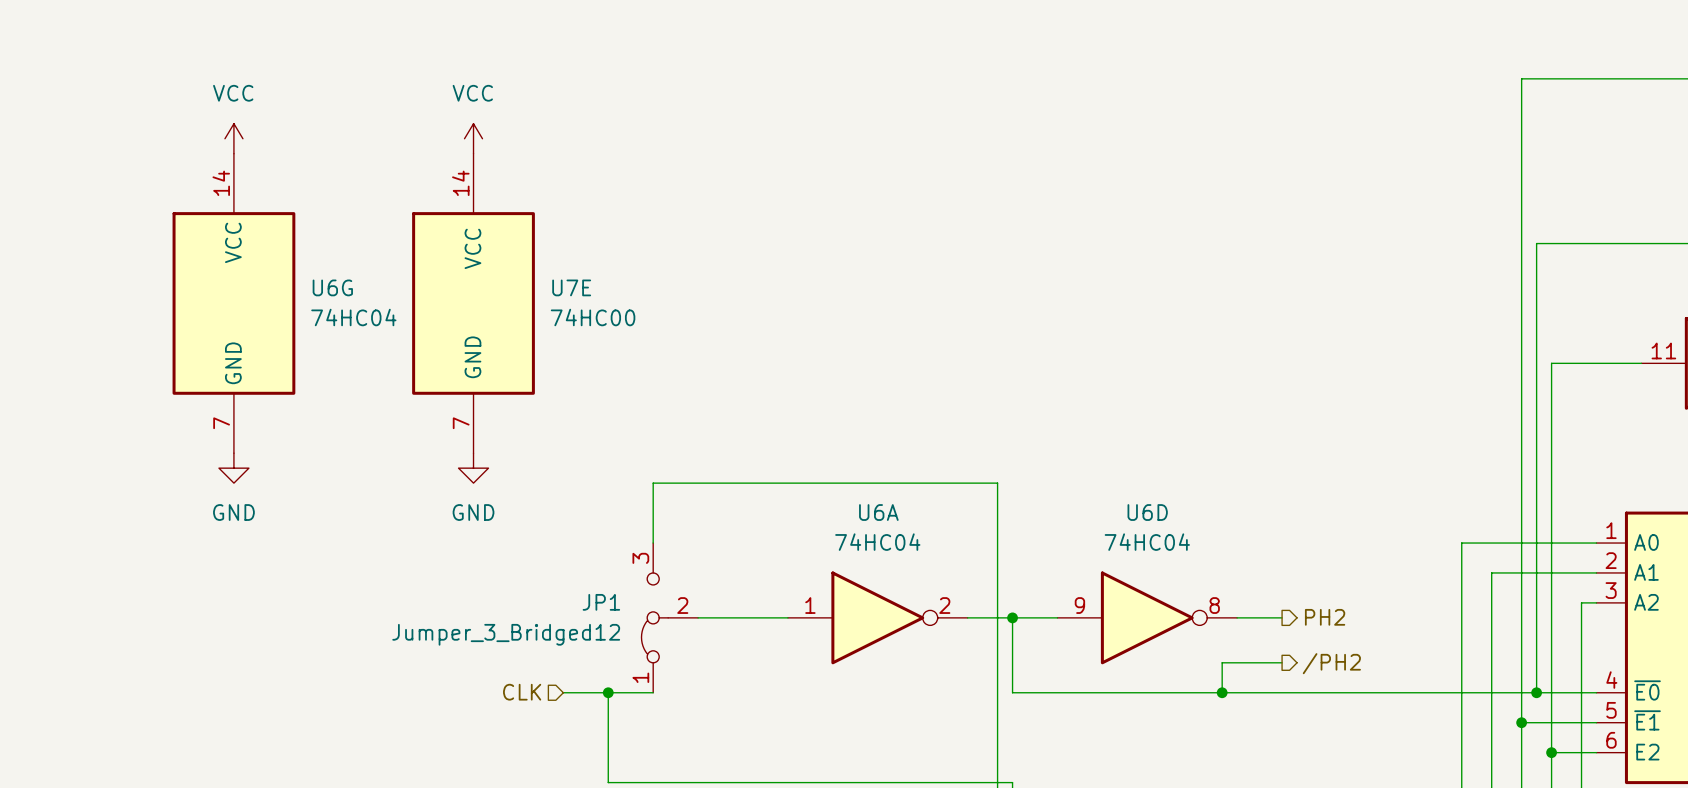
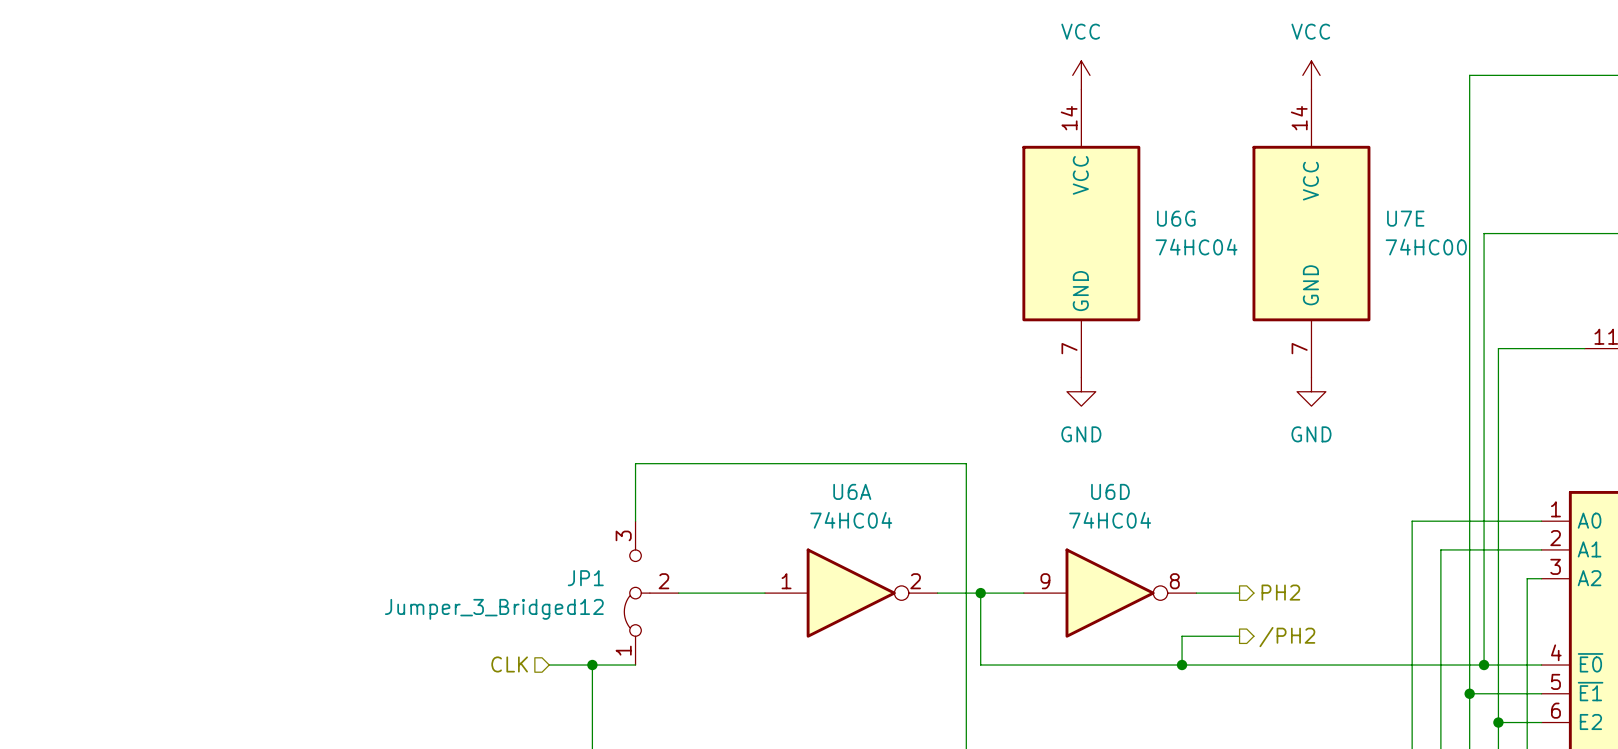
power symbol: none -> VCC (1081, 75)
power symbol: none -> VCC (1311, 75)
power symbol: VCC (233, 138) -> none
power symbol: VCC (473, 138) -> none
U6G position: (233, 303) -> (1081, 233)
U7E position: (473, 303) -> (1311, 233)
power symbol: none -> GND (1081, 391)
power symbol: none -> GND (1311, 391)
power symbol: GND (233, 468) -> none
power symbol: GND (473, 468) -> none

